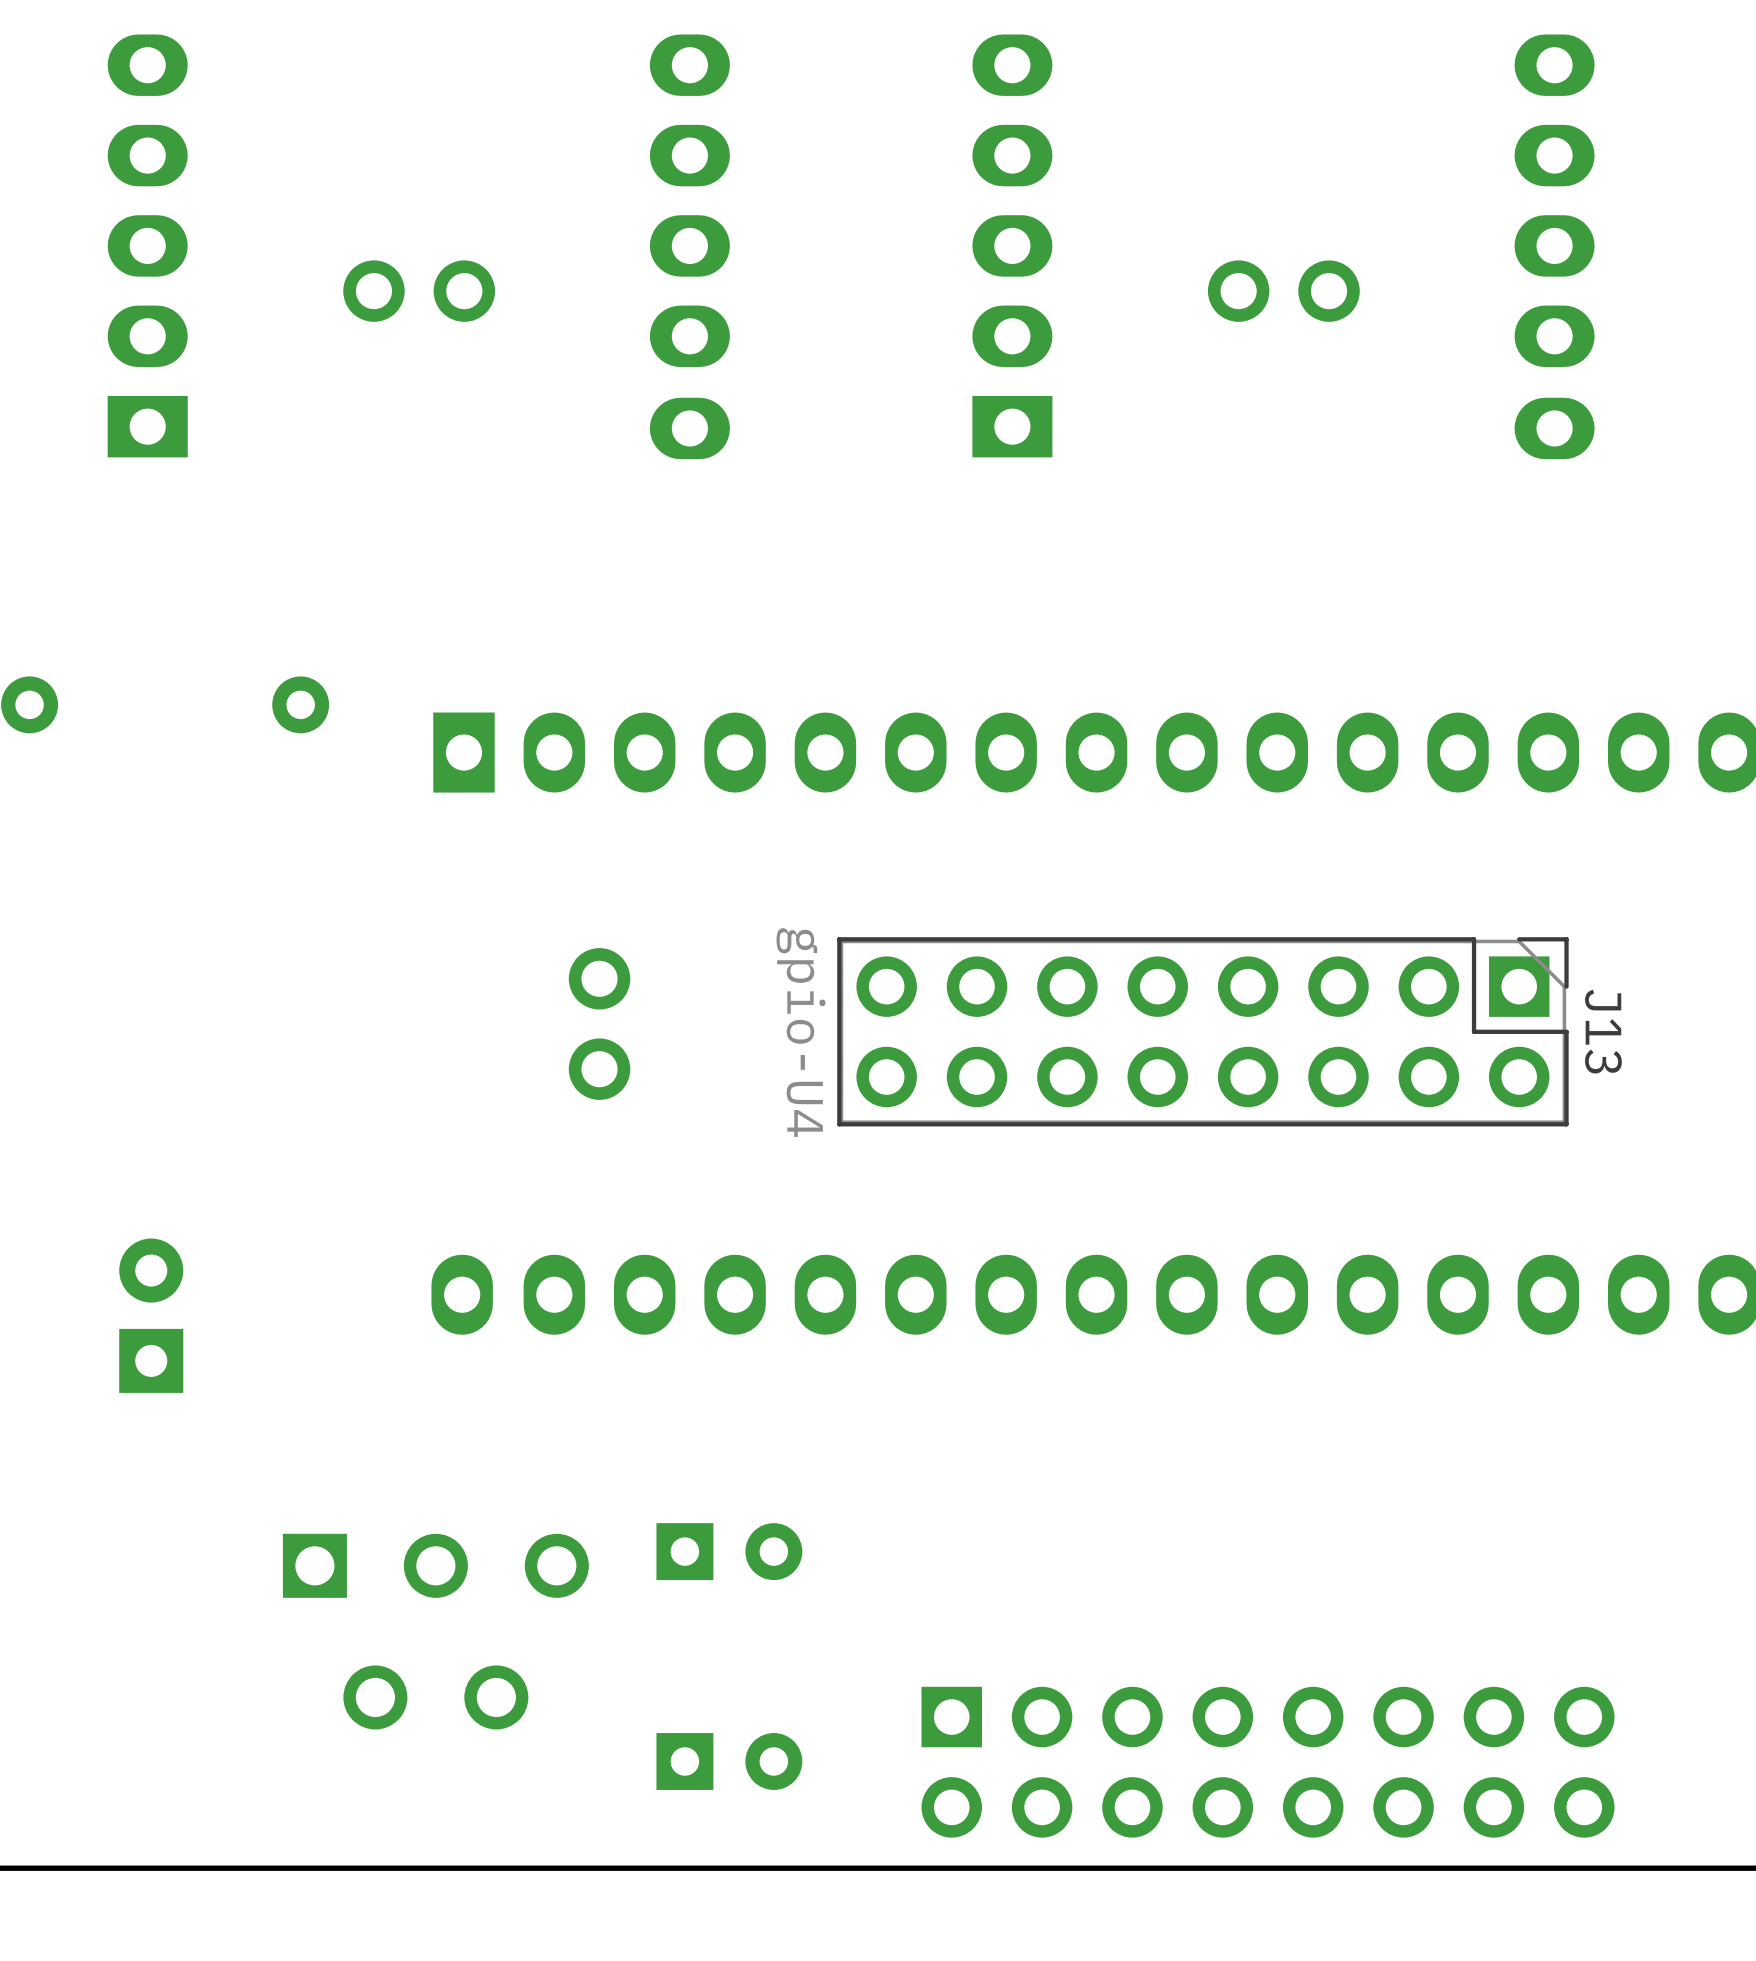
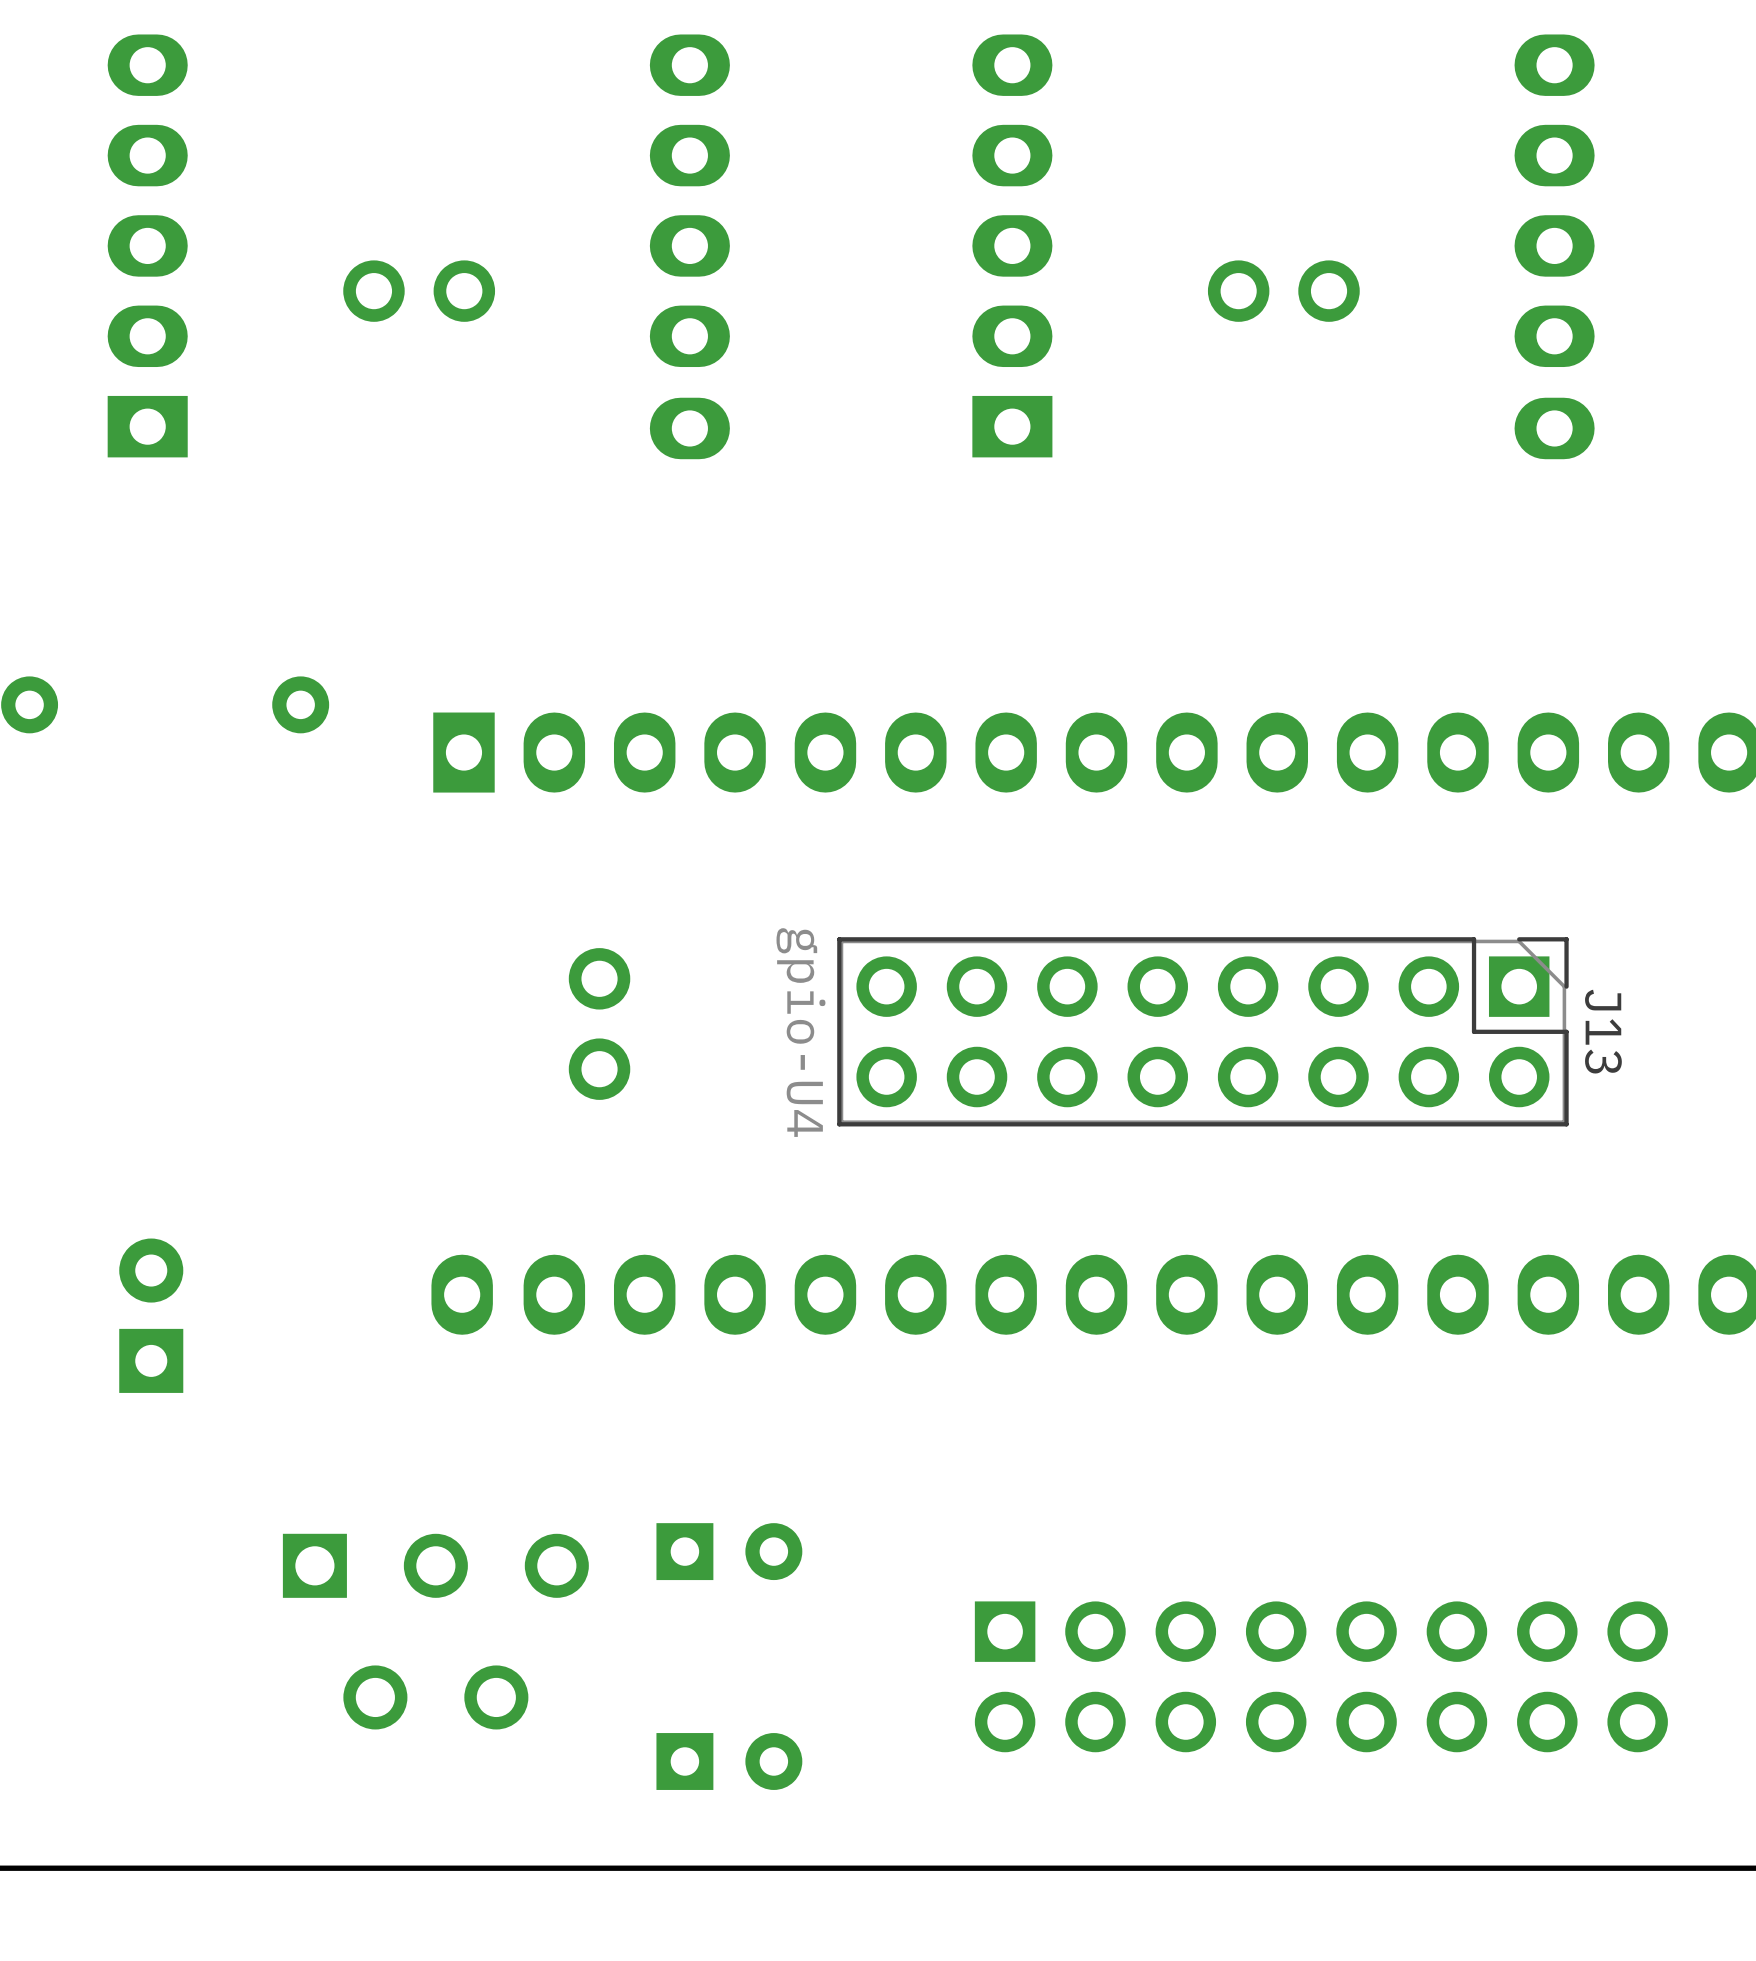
part position: (1268, 1762) -> (1321, 1676)

